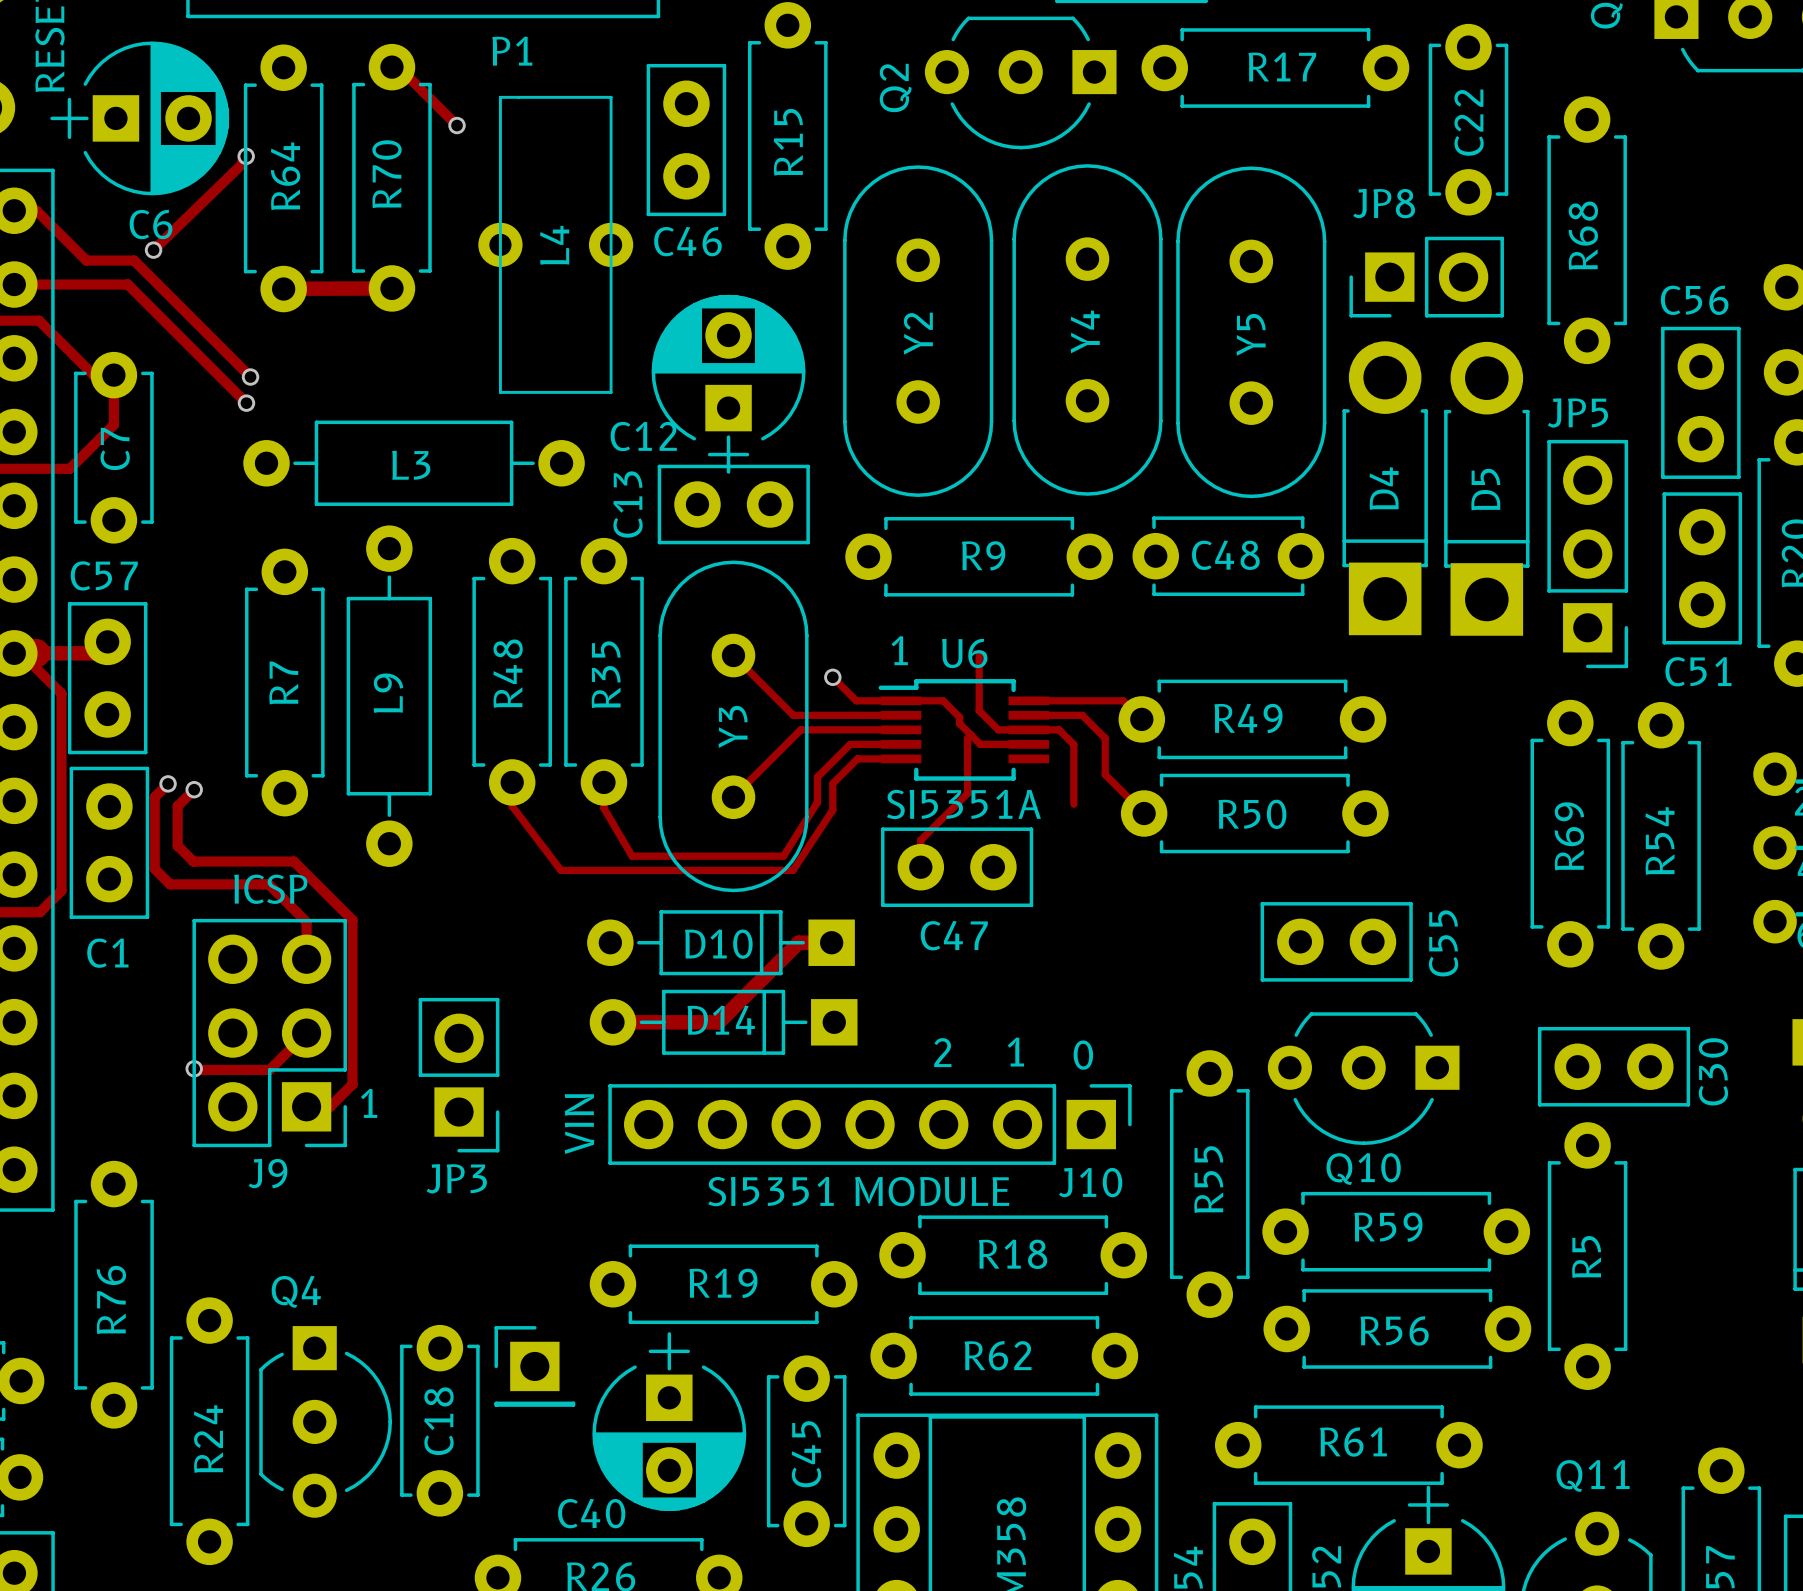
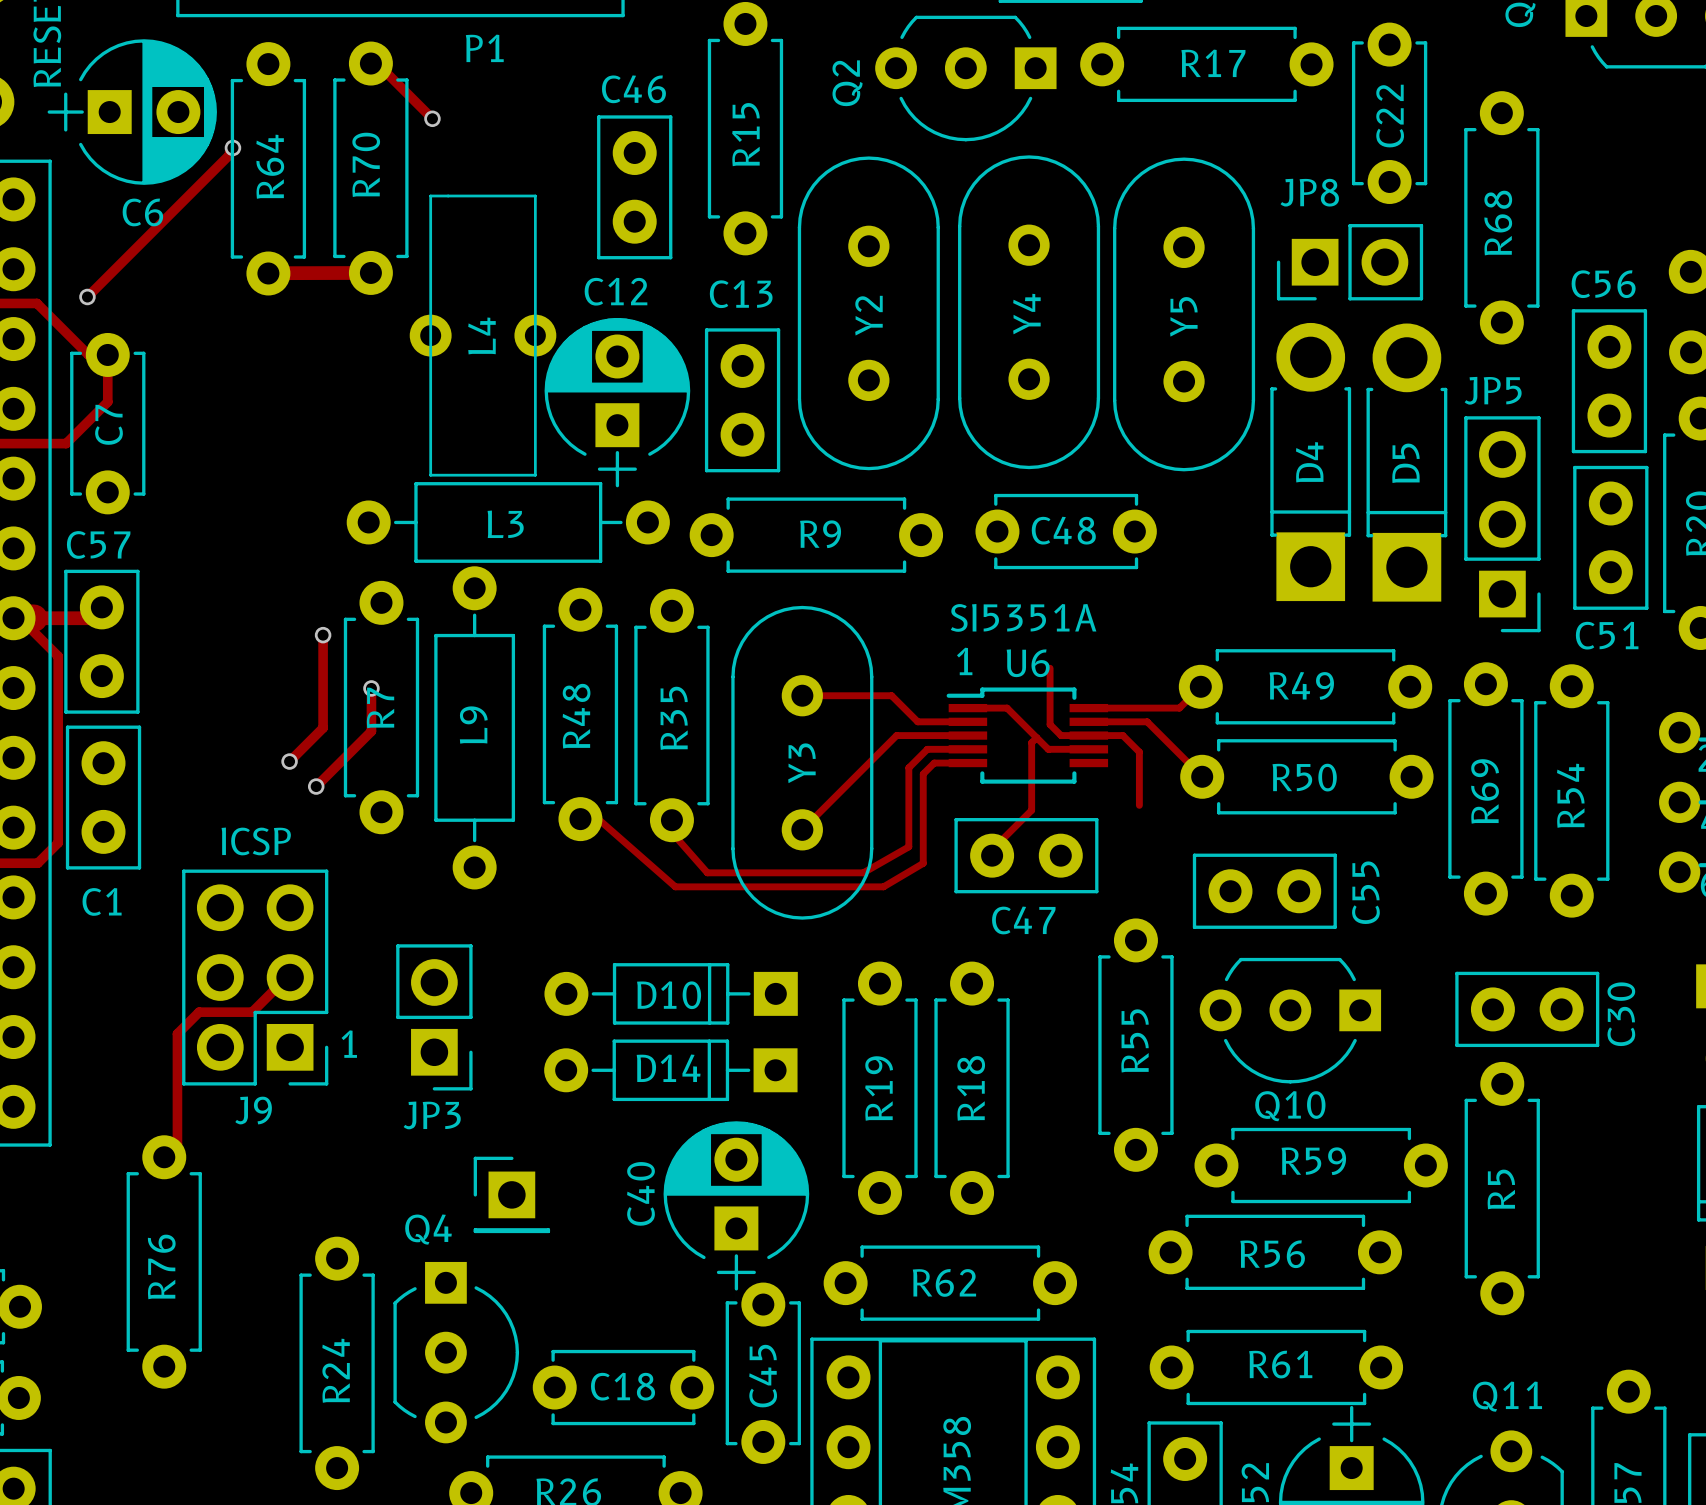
C46 position: (686, 140) -> (634, 187)
track: (242, 163) (153, 250) -> (229, 154) (87, 296)
track: (14, 210) (36, 210) (86, 260) (134, 260) (250, 377) -> none
C46 name position: C46 (687, 241) -> C46 (633, 89)
L4 position: (555, 244) -> (483, 335)
via: (153, 250) -> none
track: (14, 284) (127, 284) (246, 403) -> none
via: none -> (87, 296)
via: (250, 377) -> none
C12 position: (728, 384) -> (617, 402)
via: (246, 403) -> none
C12 name position: C12 (643, 436) -> C12 (616, 291)
L3 position: (414, 463) -> (508, 522)
C13 rotation: 0° (733, 504) -> 90° clockwise (742, 400)
C13 position: (733, 504) -> (742, 400)
R9 position: (979, 556) -> (816, 535)
C48 position: (1228, 556) -> (1066, 531)
text position: 1 (899, 650) -> 1 (964, 661)
track: (733, 655) (793, 715) (901, 715) -> none
track: (979, 655) (979, 710) (998, 729) (1059, 729) (1073, 744) (1073, 804) -> none
track: none -> (323, 635) (323, 728) (289, 761)
via: none -> (323, 635)
R48 position: (512, 671) -> (580, 714)
R35 position: (603, 671) -> (671, 715)
track: (832, 677) (856, 700) (943, 700) (959, 717) (959, 723) (980, 744) (1028, 744) -> none
via: (832, 677) -> none
R7 position: (284, 682) -> (381, 707)
L9 position: (389, 696) -> (474, 727)
track: (1028, 700) (1123, 700) (1141, 719) -> none
track: none -> (1050, 668) (1050, 724) (1061, 735) (1122, 735) (1139, 752) (1139, 805)
track: (1028, 715) (1082, 715) (1105, 738) (1105, 774) (1144, 813) -> none
R49 position: (1252, 719) -> (1305, 686)
track: none -> (1200, 686) (1179, 708) (1088, 708)
Y3 position: (733, 726) -> (802, 762)
track: none -> (371, 688) (371, 731) (316, 786)
via: none -> (371, 688)
track: (901, 729) (800, 729) (733, 797) -> none
U6 position: (963, 729) -> (1027, 735)
track: none -> (802, 695) (891, 695) (917, 721) (967, 721)
track: (971, 735) (967, 738) (967, 793) (920, 840) (920, 867) -> none
track: (901, 744) (850, 744) (817, 777) (817, 802) (783, 856) (632, 856) (603, 808) (603, 782) -> none
track: none -> (967, 708) (1007, 708) (1048, 749) (1088, 749)
track: (901, 758) (857, 758) (832, 783) (832, 810) (793, 870) (560, 870) (512, 806) (512, 782) -> none
track: none -> (1088, 721) (1147, 721) (1202, 776)
track: none -> (967, 735) (896, 735) (802, 829)
track: none -> (1036, 737) (1031, 742) (1031, 810) (992, 849) (992, 855)
track: (168, 783) (154, 797) (154, 868) (170, 884) (268, 884) (306, 922) (306, 959) -> none
via: (168, 783) -> none
track: (194, 789) (177, 806) (177, 845) (193, 861) (293, 861) (352, 920) (352, 1084) (330, 1106) (306, 1106) -> none
via: (194, 789) -> none
track: none -> (967, 749) (927, 749) (908, 767) (908, 846) (863, 872) (707, 872) (671, 832) (671, 820)
via: none -> (289, 761)
text position: SI5351A (963, 804) -> SI5351A (1023, 617)
track: none -> (967, 763) (934, 763) (923, 774) (923, 863) (883, 886) (675, 886) (598, 819) (580, 819)
R50 position: (1254, 813) -> (1306, 776)
via: none -> (316, 786)
C47 position: (957, 867) -> (1026, 855)
D10 position: (721, 942) -> (671, 993)
track: (831, 942) (798, 942) (718, 1022) (612, 1022) -> none
D14 position: (723, 1022) -> (670, 1070)
track: (306, 1033) (269, 1069) (194, 1068) -> (290, 977) (286, 977) (252, 1012) (199, 1012) (177, 1033) (177, 1144) (164, 1157)
text: 2 (942, 1052) -> none
text: 1 (1015, 1052) -> none
text: 0 (1083, 1055) -> none
via: (194, 1068) -> none
text: VIN (579, 1124) -> none
J10: (869, 1124) -> none
R55 position: (1209, 1184) -> (1135, 1045)
text: SI5351 MODULE (858, 1191) -> none
R18 rotation: 0° (1013, 1255) -> 90° clockwise (972, 1088)
R19 rotation: 0° (723, 1284) -> 90° clockwise (879, 1088)
R19 position: (723, 1284) -> (879, 1088)
R76 position: (114, 1294) -> (164, 1261)
R56 position: (1397, 1328) -> (1275, 1252)
part position: (534, 1366) -> (511, 1194)
C18 rotation: 0° (439, 1420) -> 90° clockwise (623, 1387)
C18 position: (439, 1420) -> (623, 1387)
Q4 position: (325, 1421) -> (456, 1352)
C40 rotation: 0° (669, 1421) -> 180° (736, 1205)
C40 position: (669, 1421) -> (736, 1205)
R24 position: (209, 1431) -> (337, 1363)
C40 name position: C40 (591, 1513) -> C40 (640, 1193)

